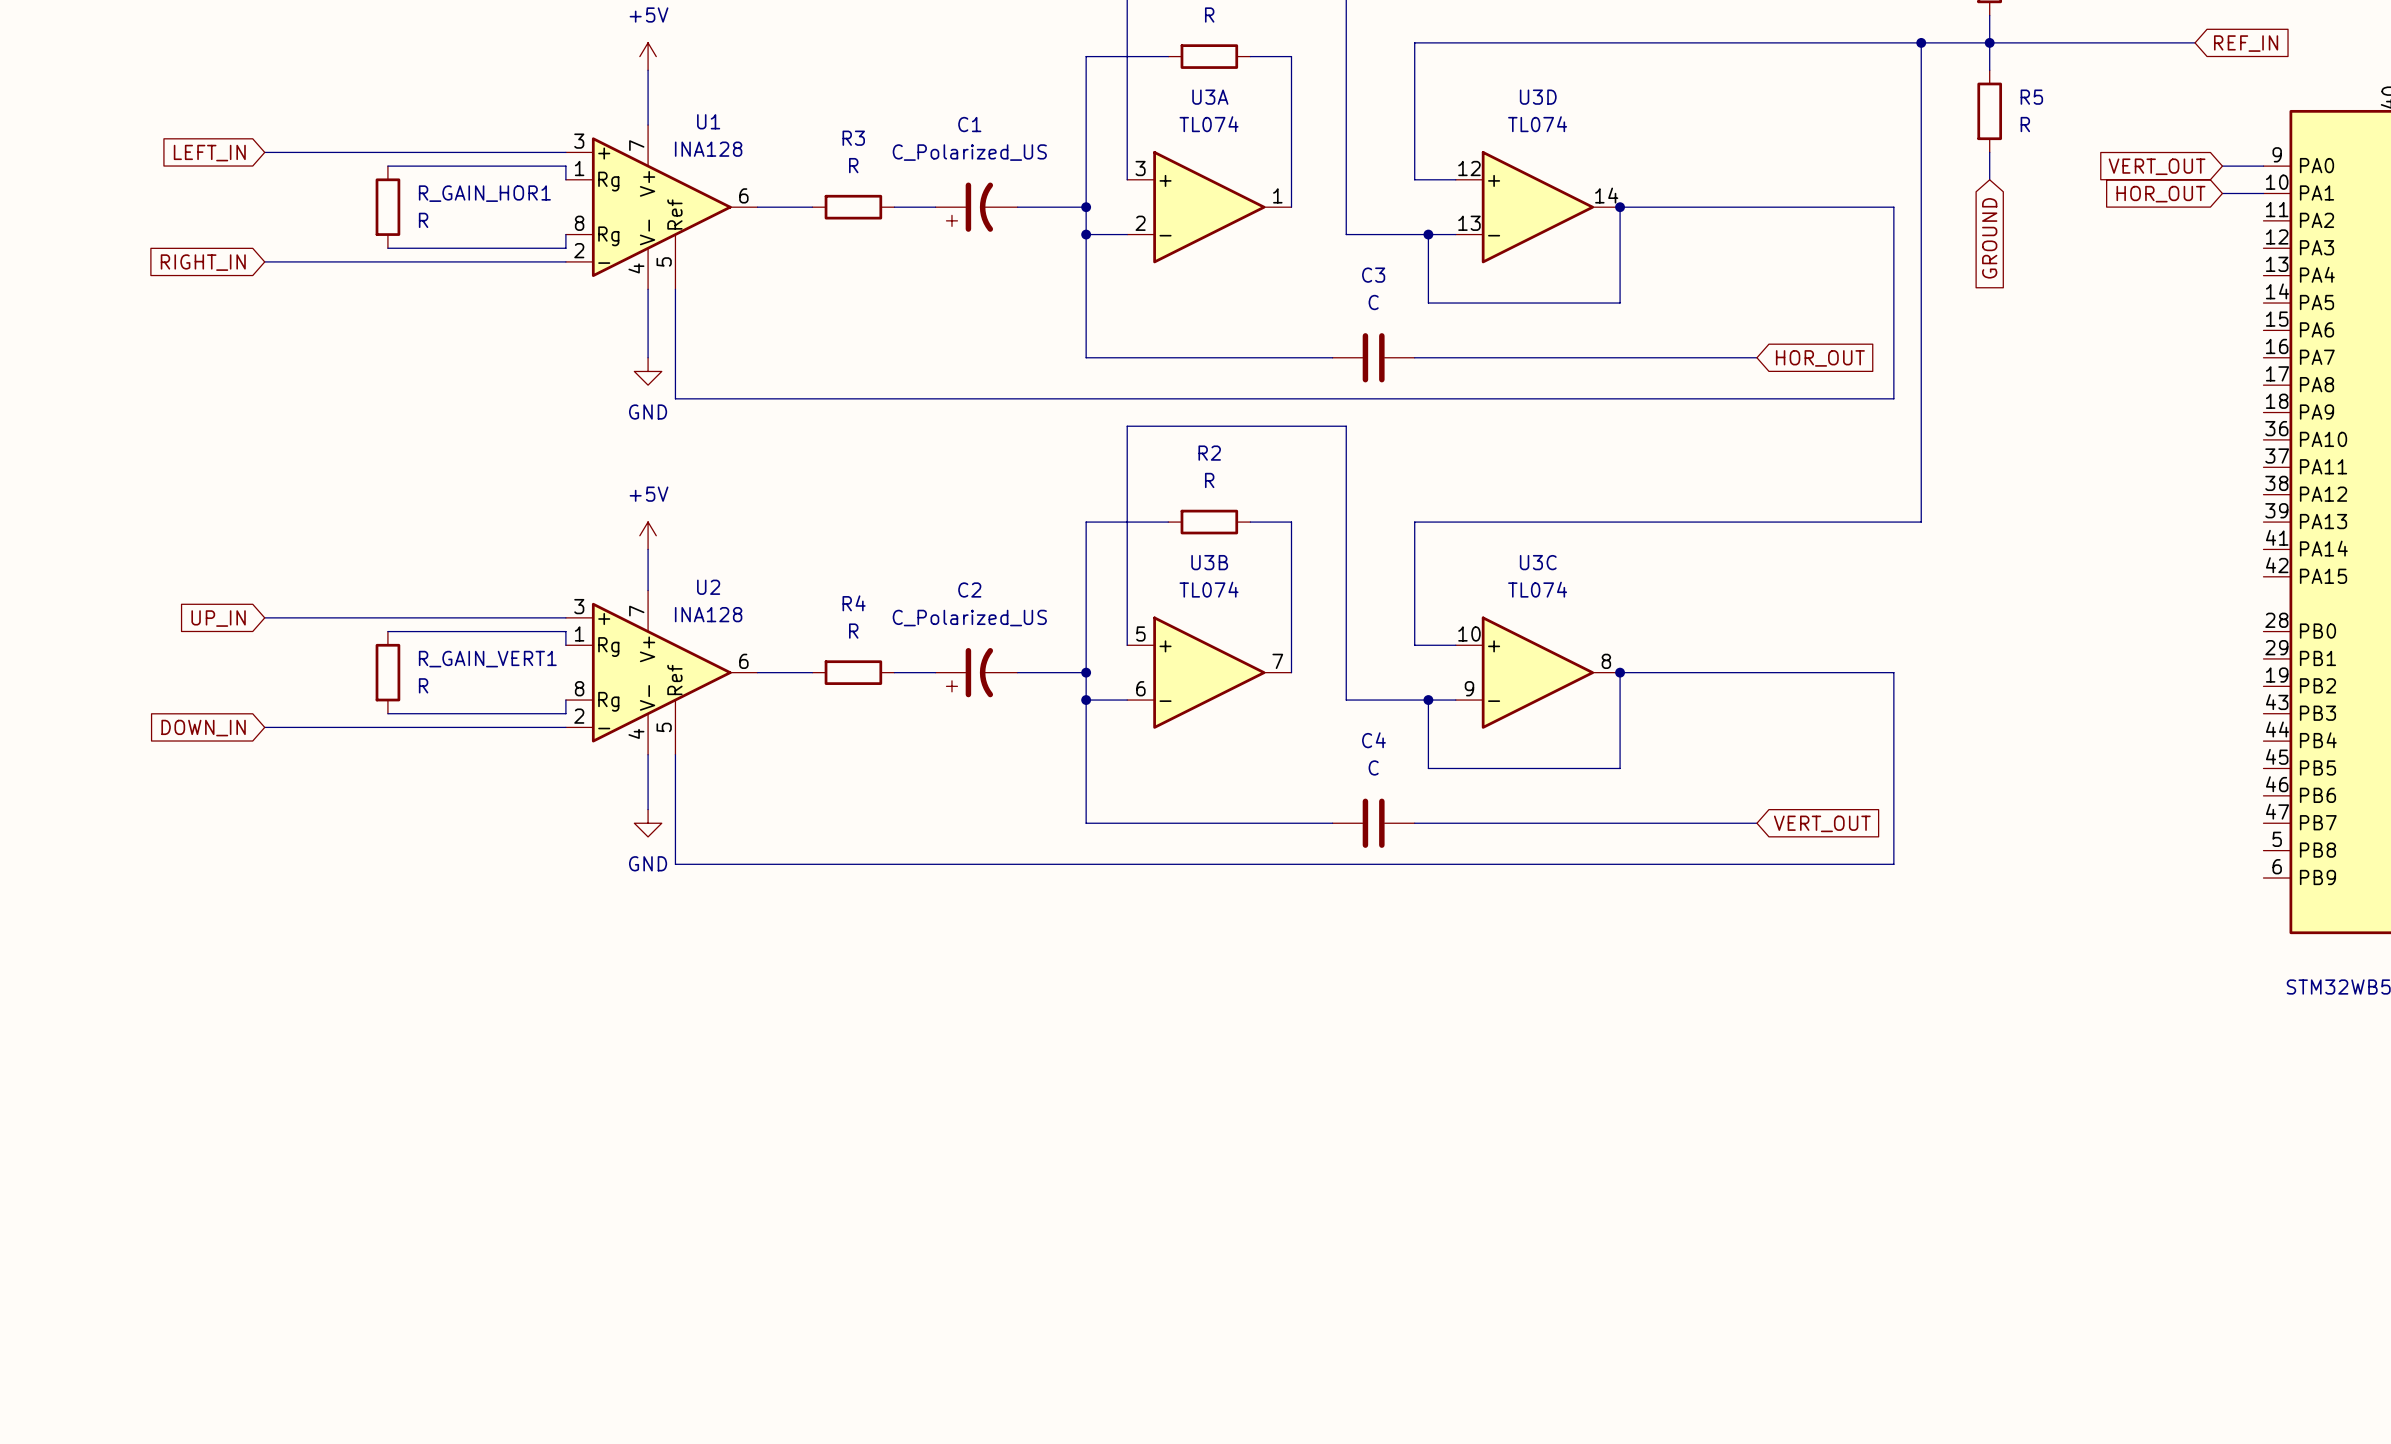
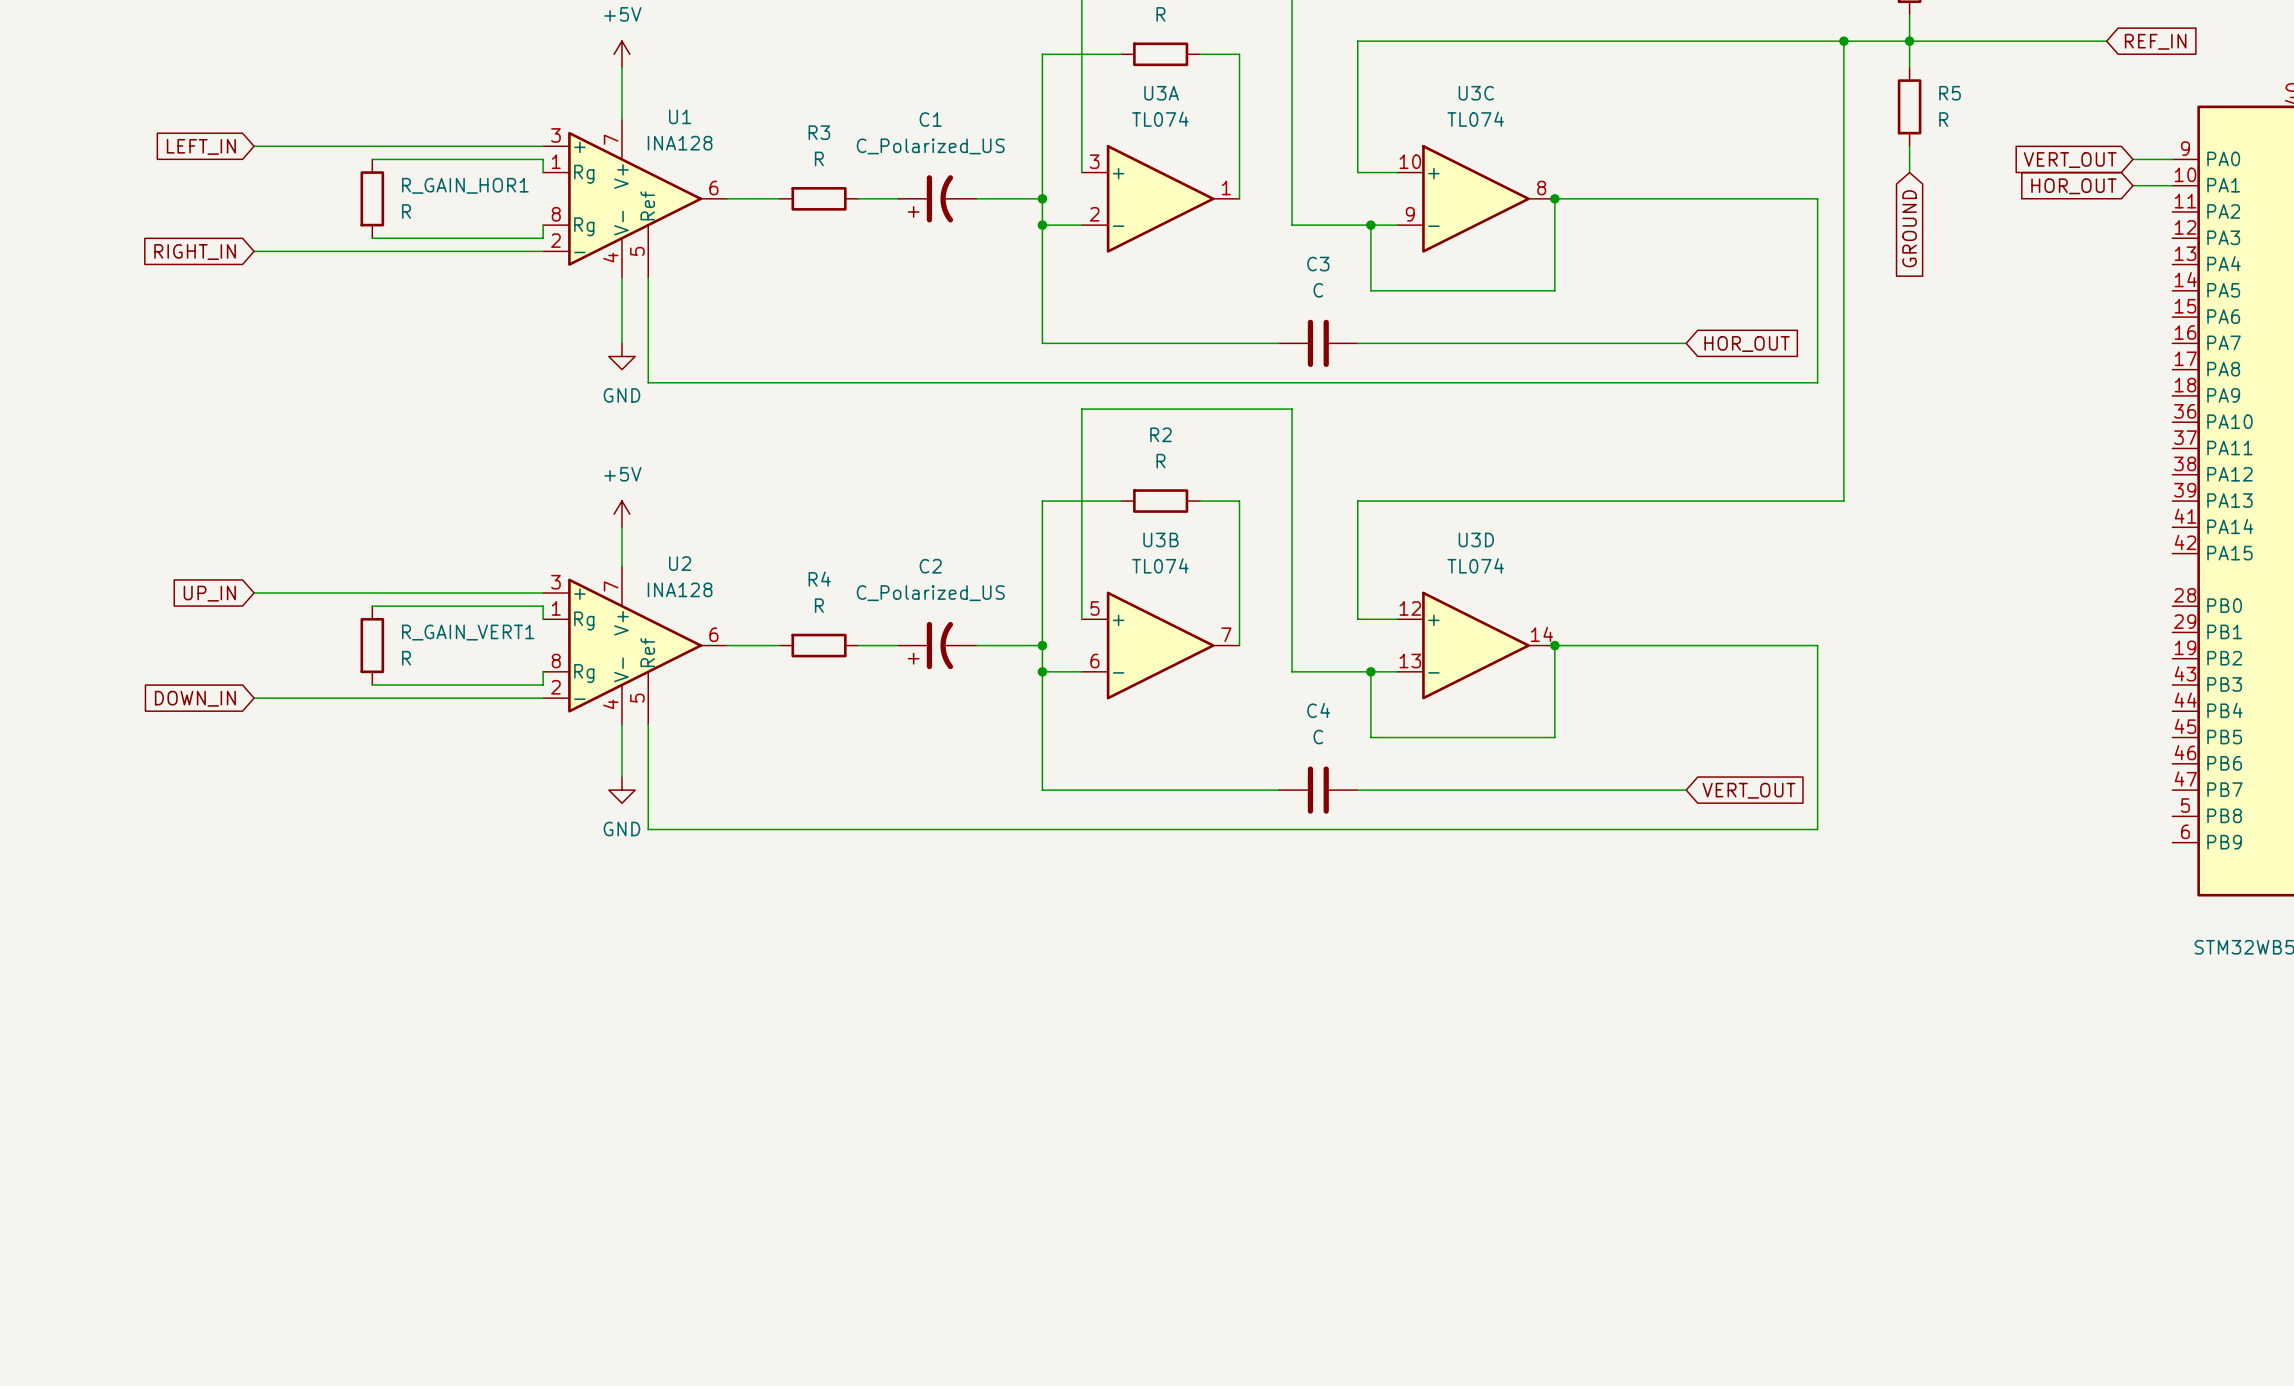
U3D position: (1537, 207) -> (1476, 645)
U3C position: (1537, 672) -> (1476, 198)

